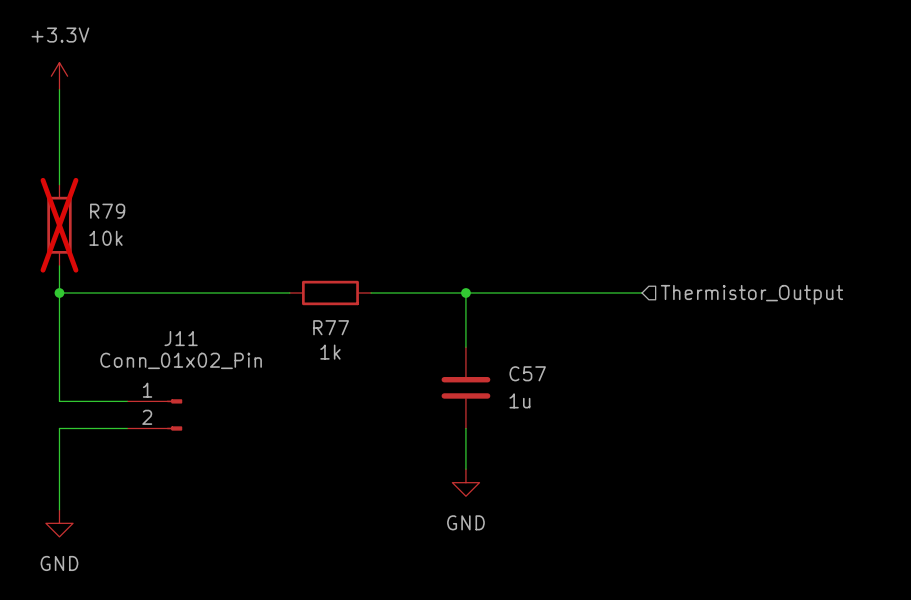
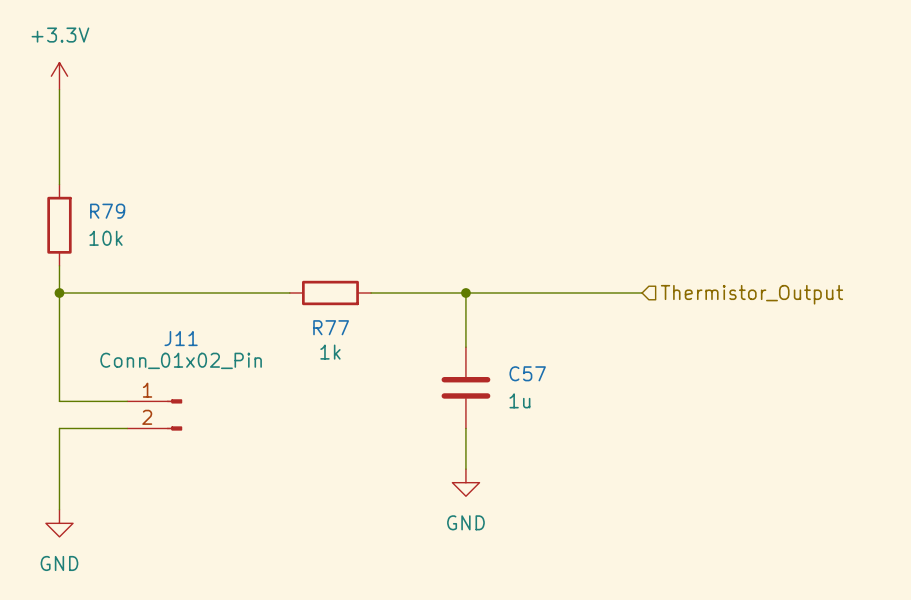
R79 do-not-place cross: (59, 225) -> none

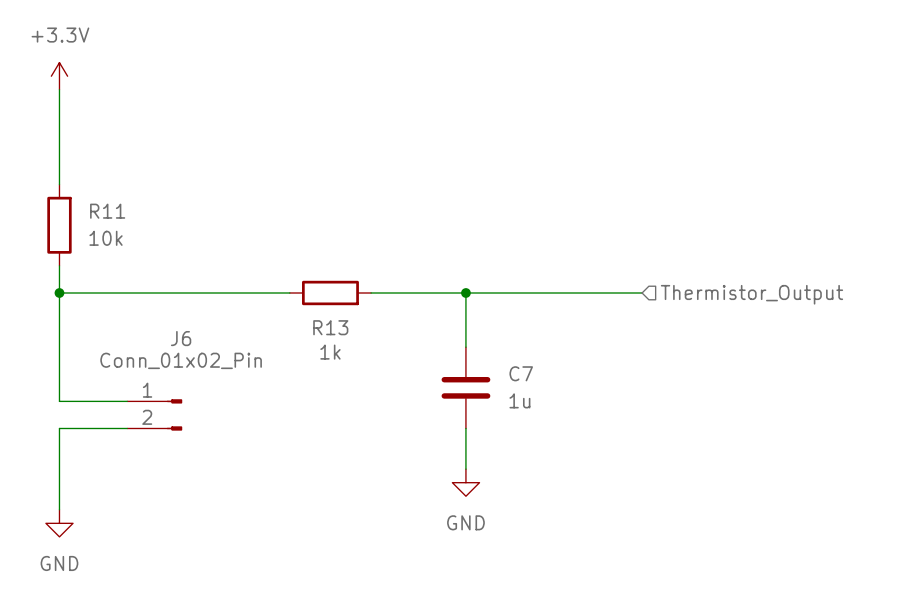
R79 name: R79 (107, 211) -> R11 (107, 211)
R77 name: R77 (331, 327) -> R13 (330, 327)
J11 name: J11 (181, 338) -> J6 (181, 338)
C57 name: C57 (527, 373) -> C7 (521, 373)

